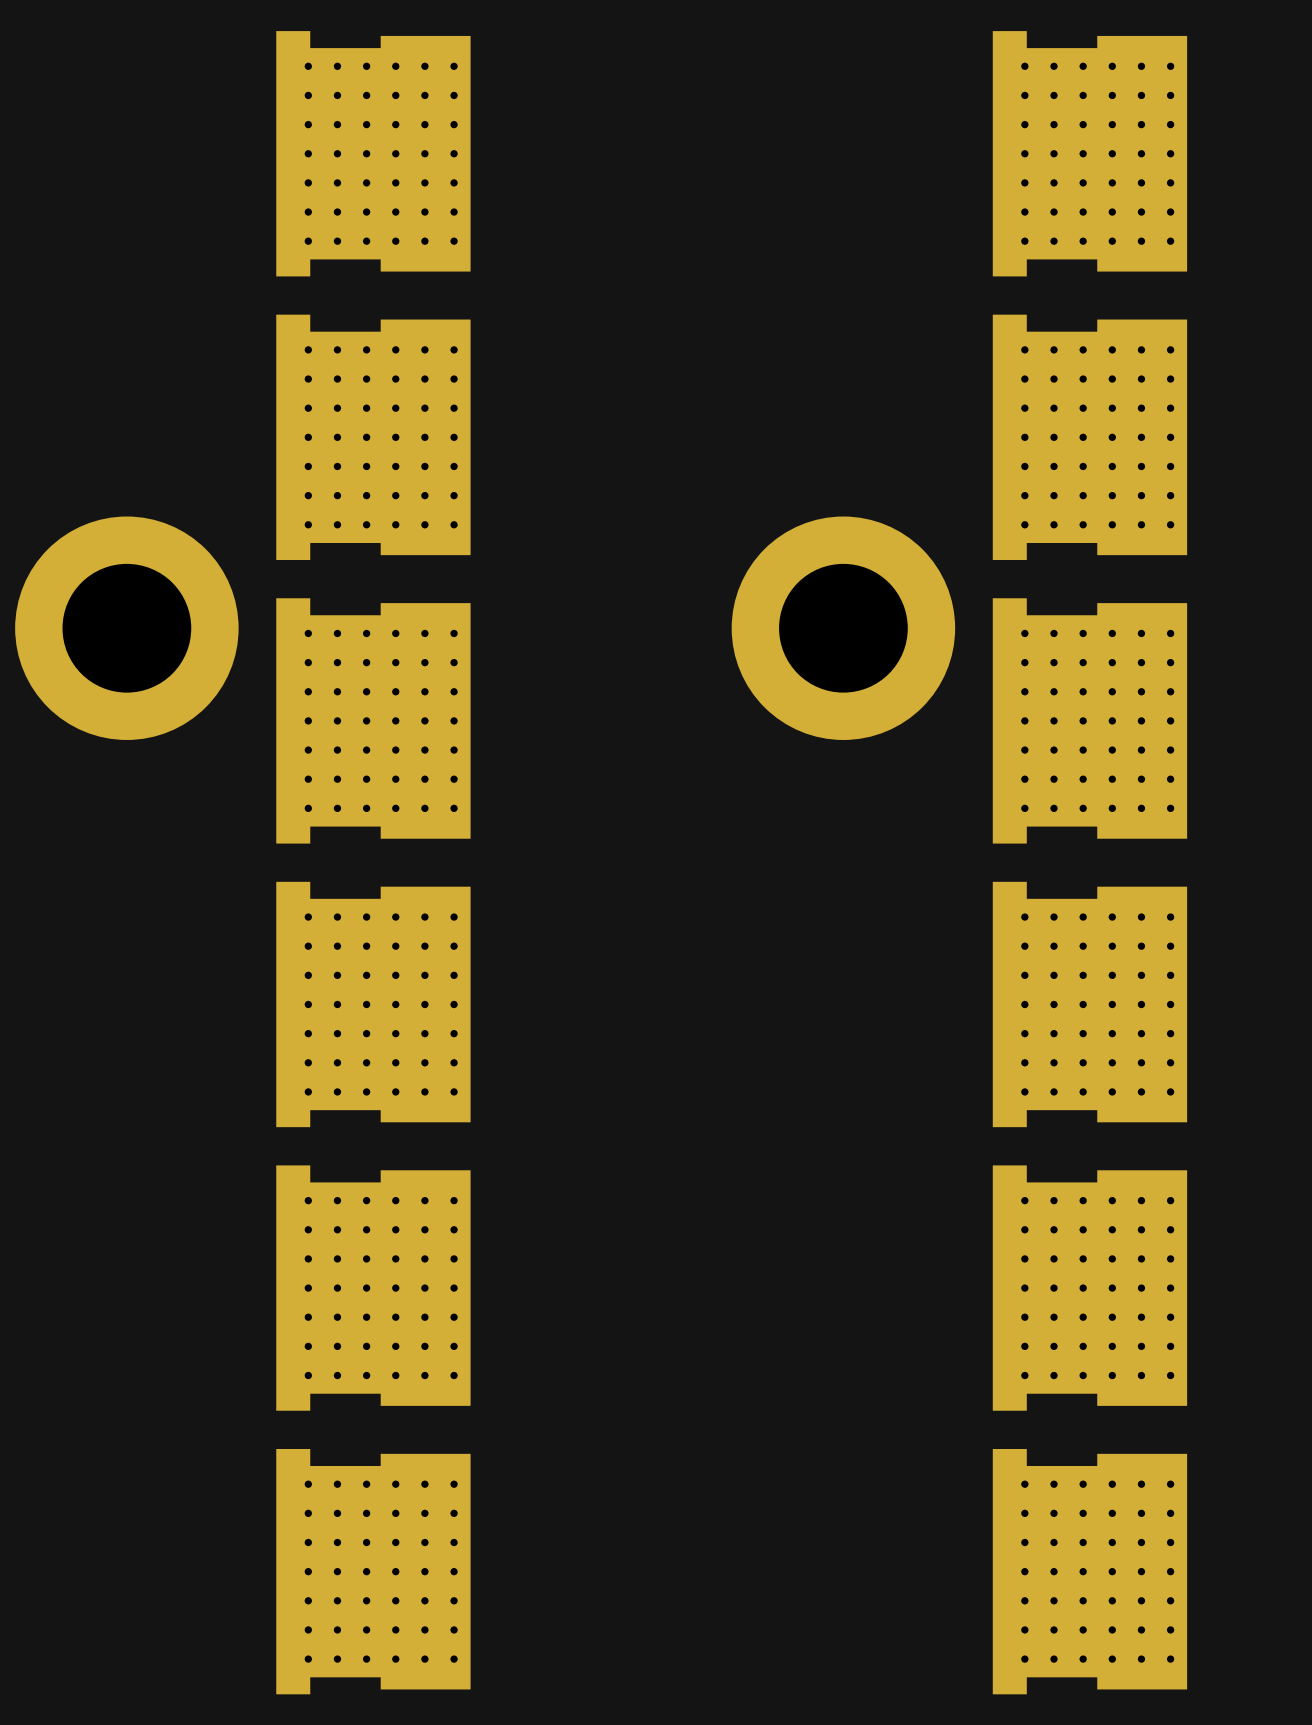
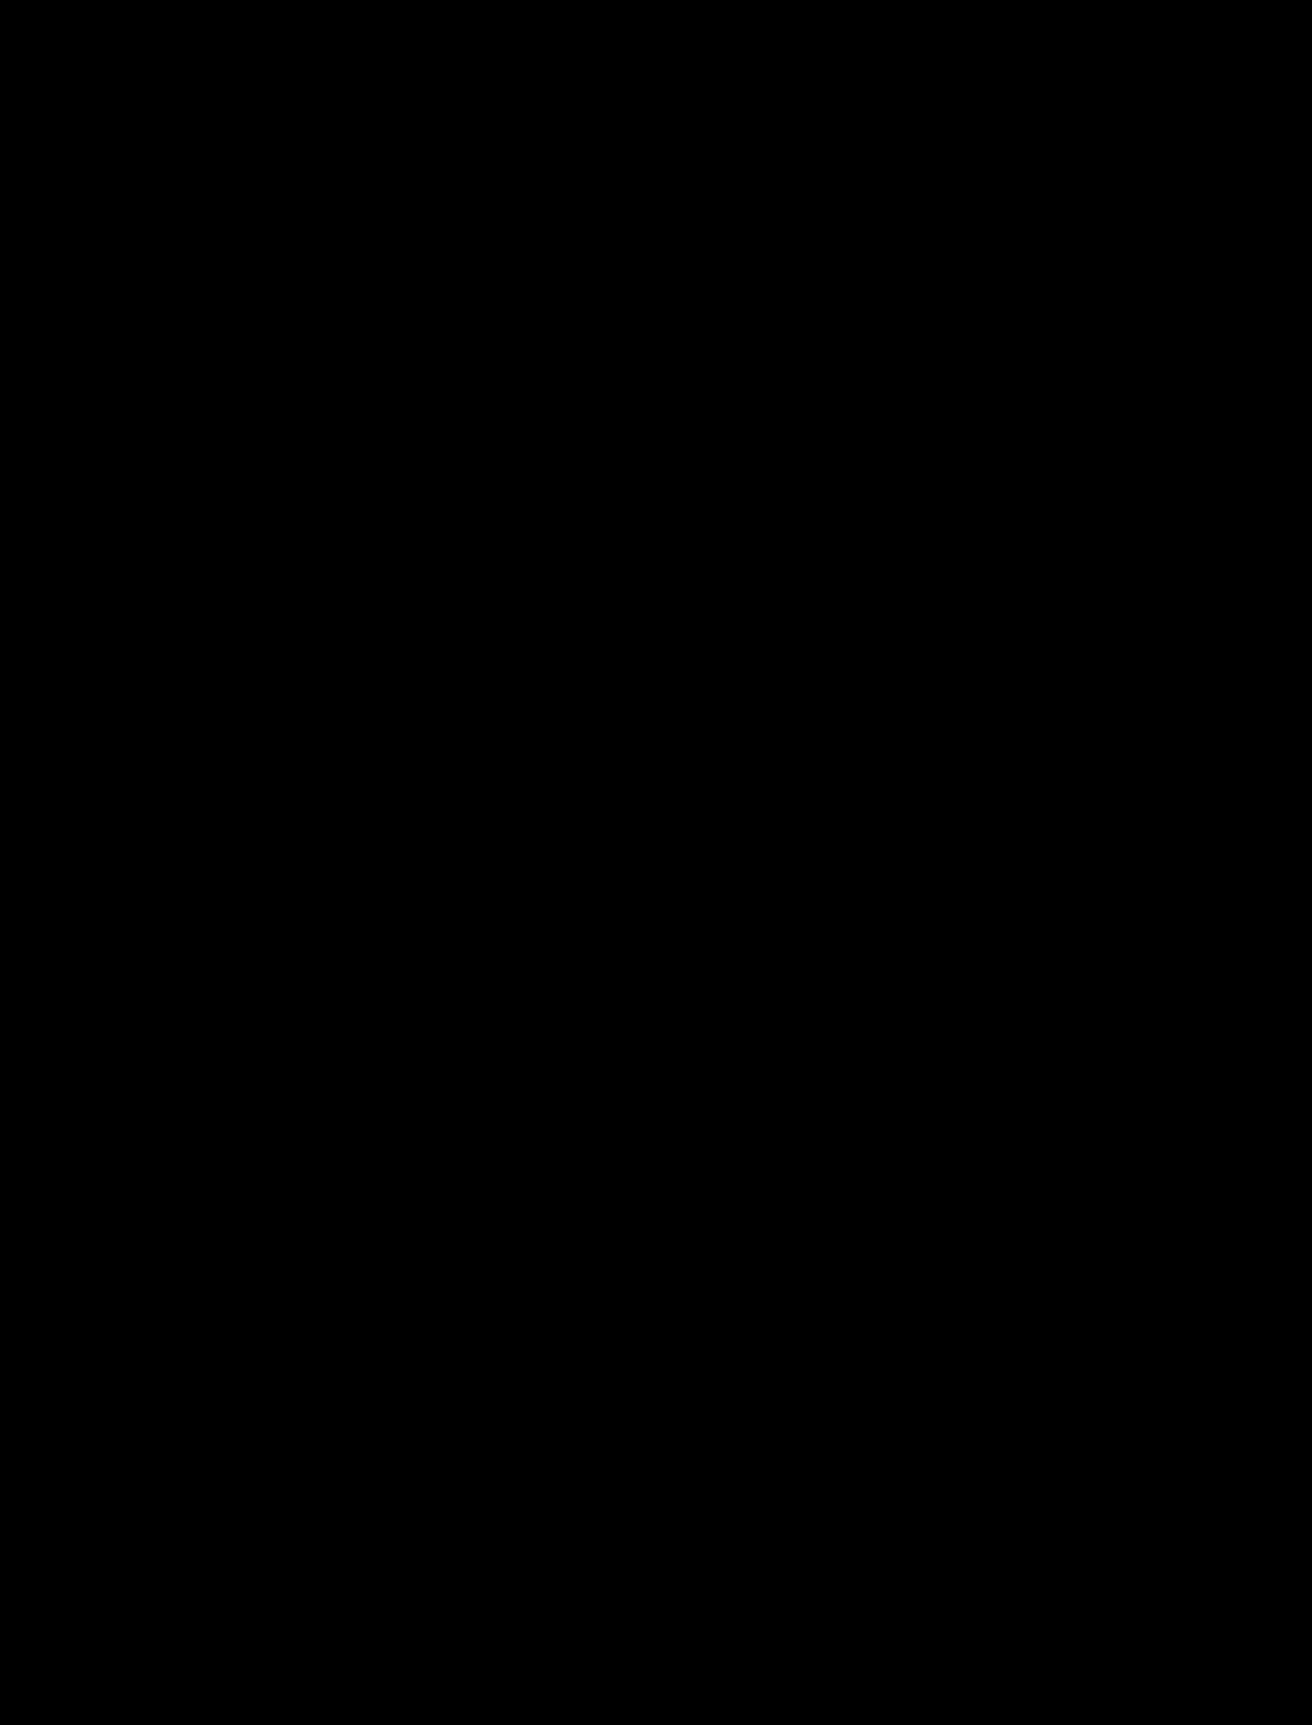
part: (373, 153) -> none
part: (1089, 153) -> none
part: (373, 437) -> none
part: (1089, 437) -> none
part: (126, 628) -> none
part: (843, 628) -> none
part: (373, 720) -> none
part: (1089, 720) -> none
part: (373, 1004) -> none
part: (1089, 1004) -> none
part: (373, 1288) -> none
part: (1089, 1288) -> none
part: (373, 1571) -> none
part: (1089, 1571) -> none

